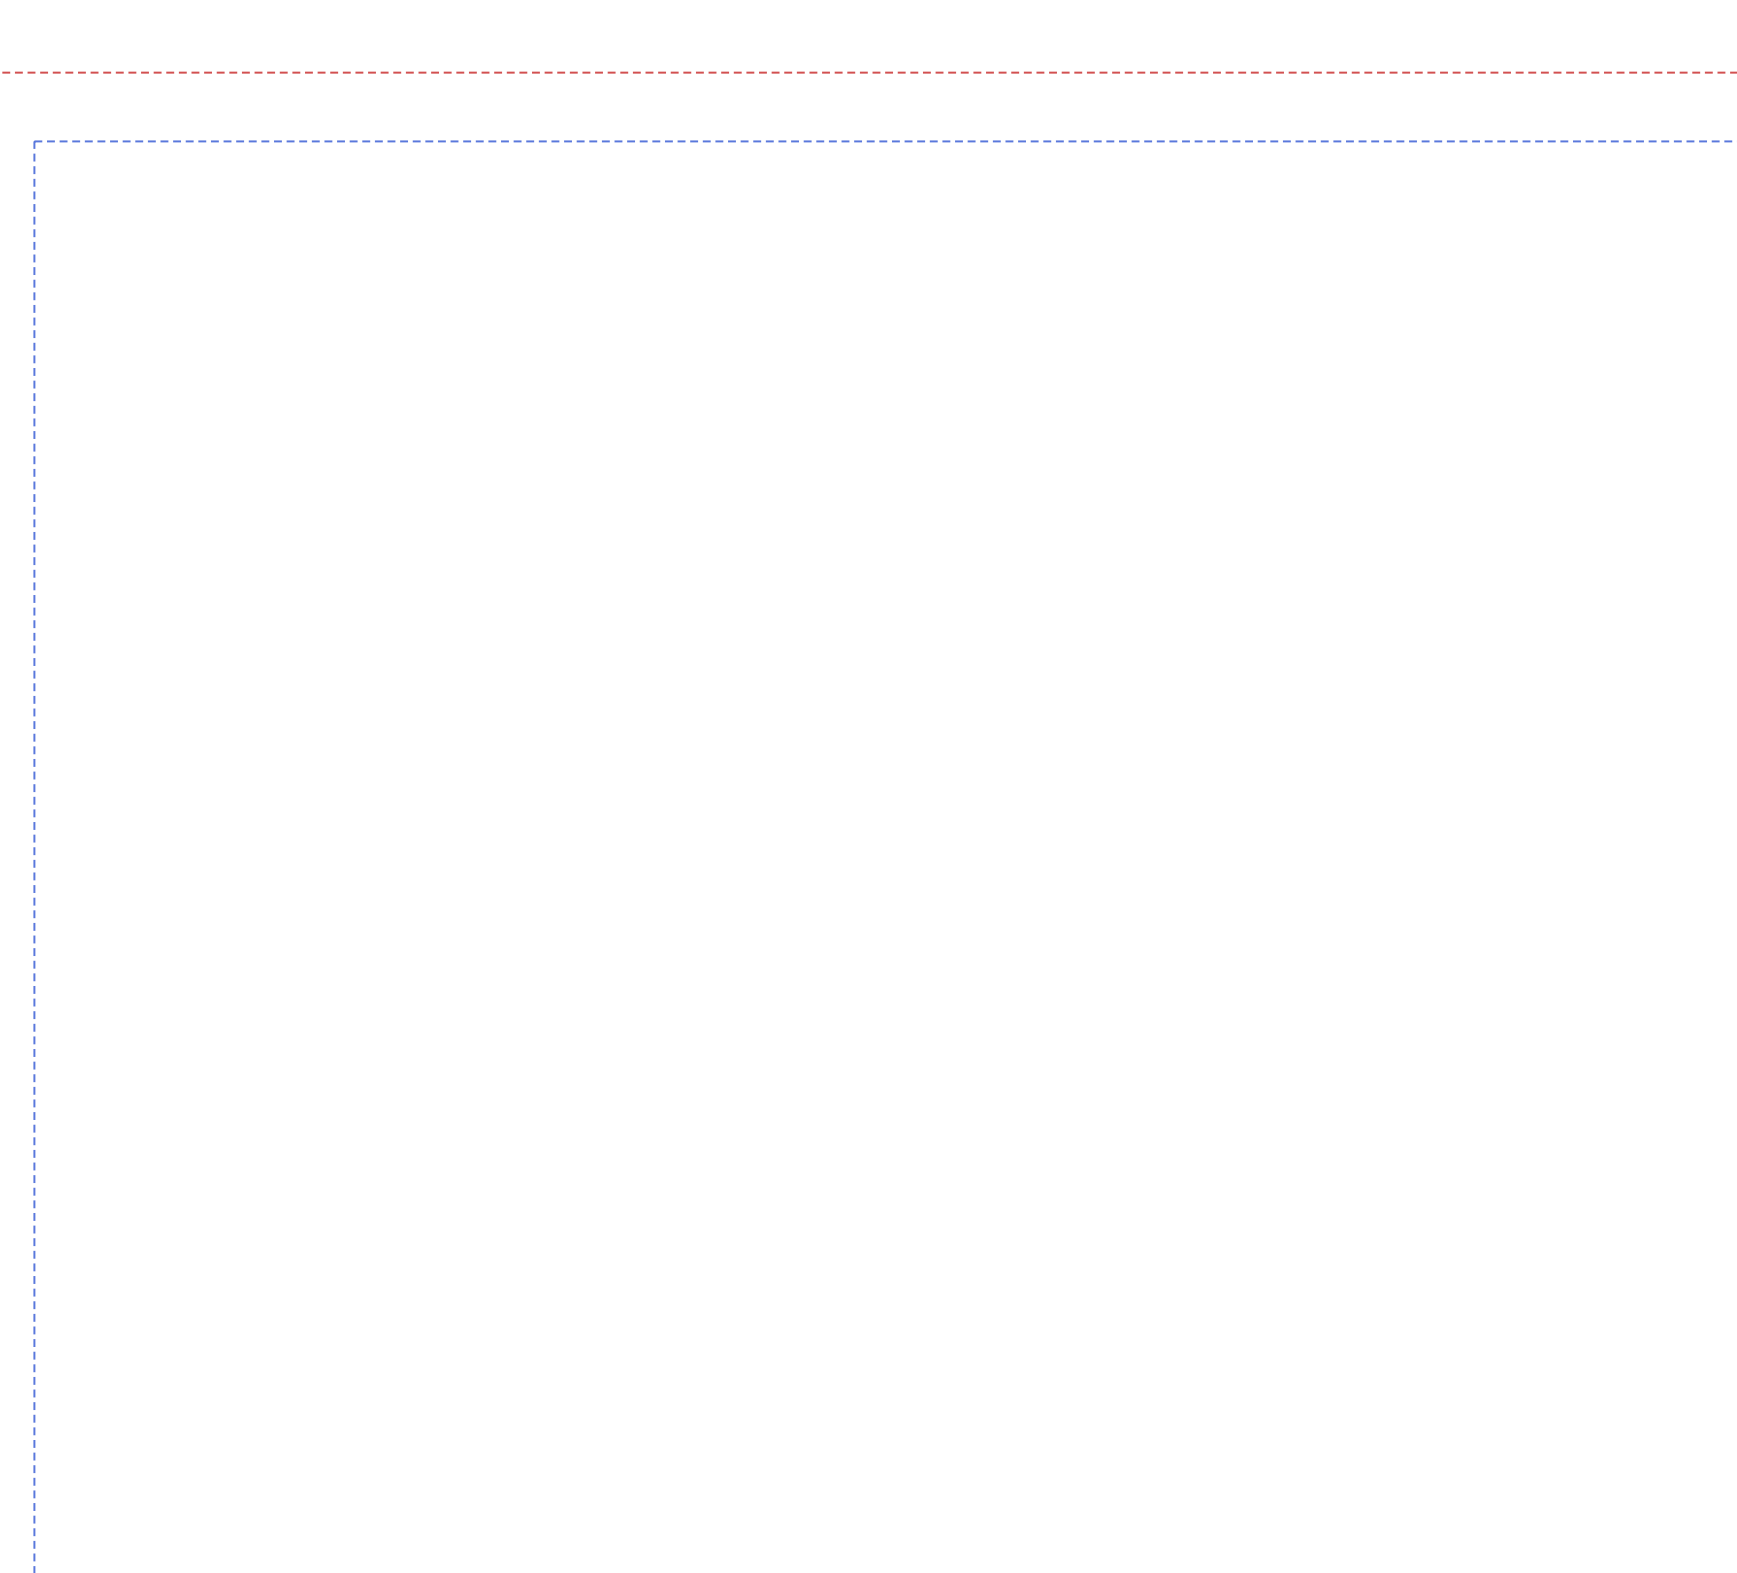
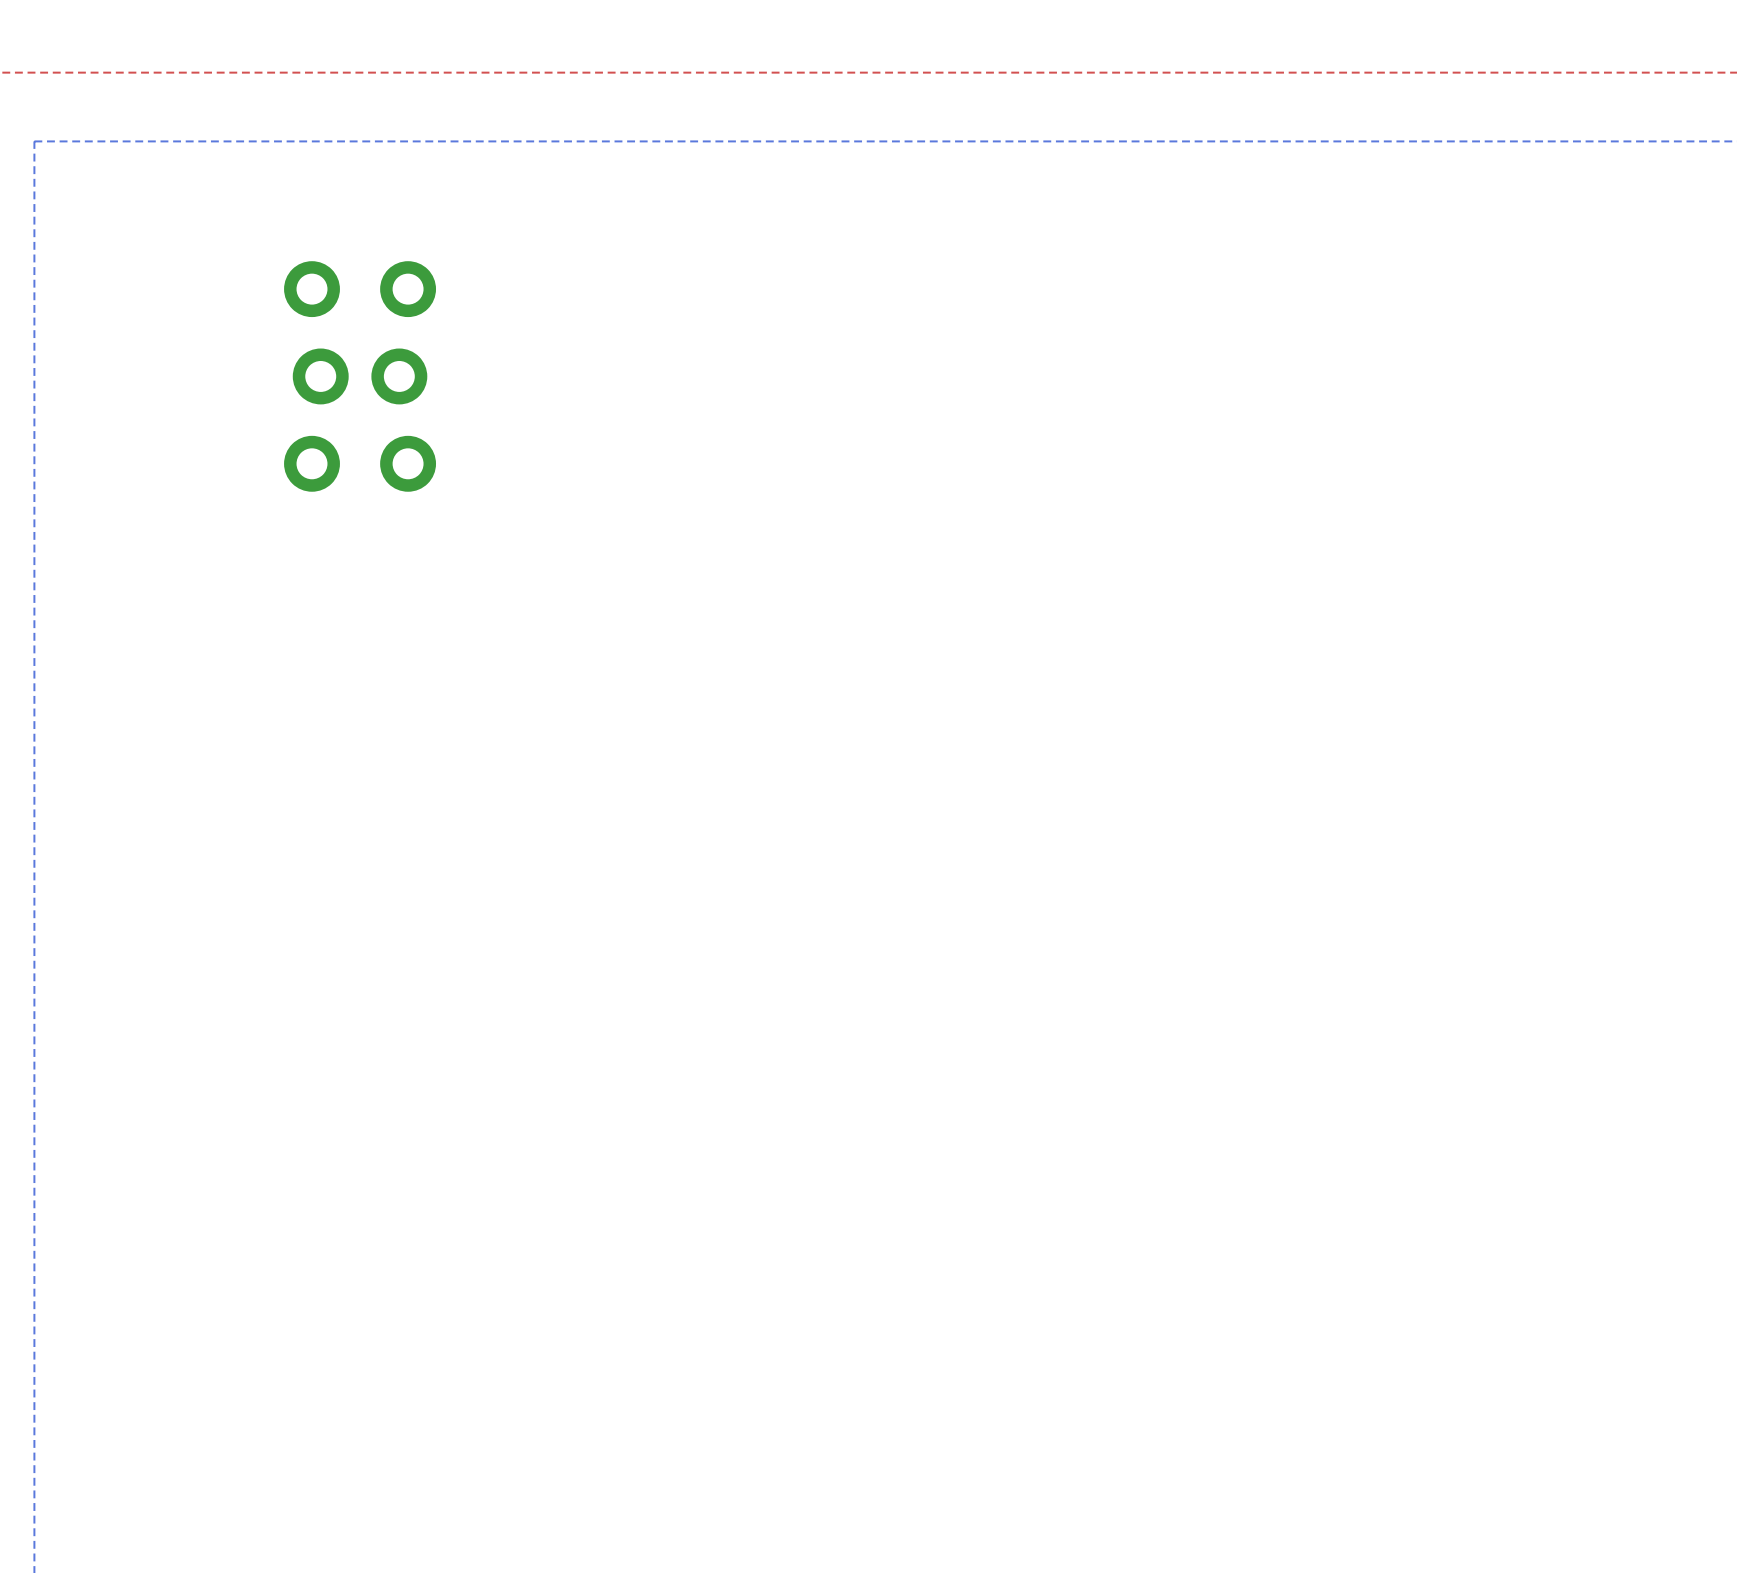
part: none -> (360, 376)

